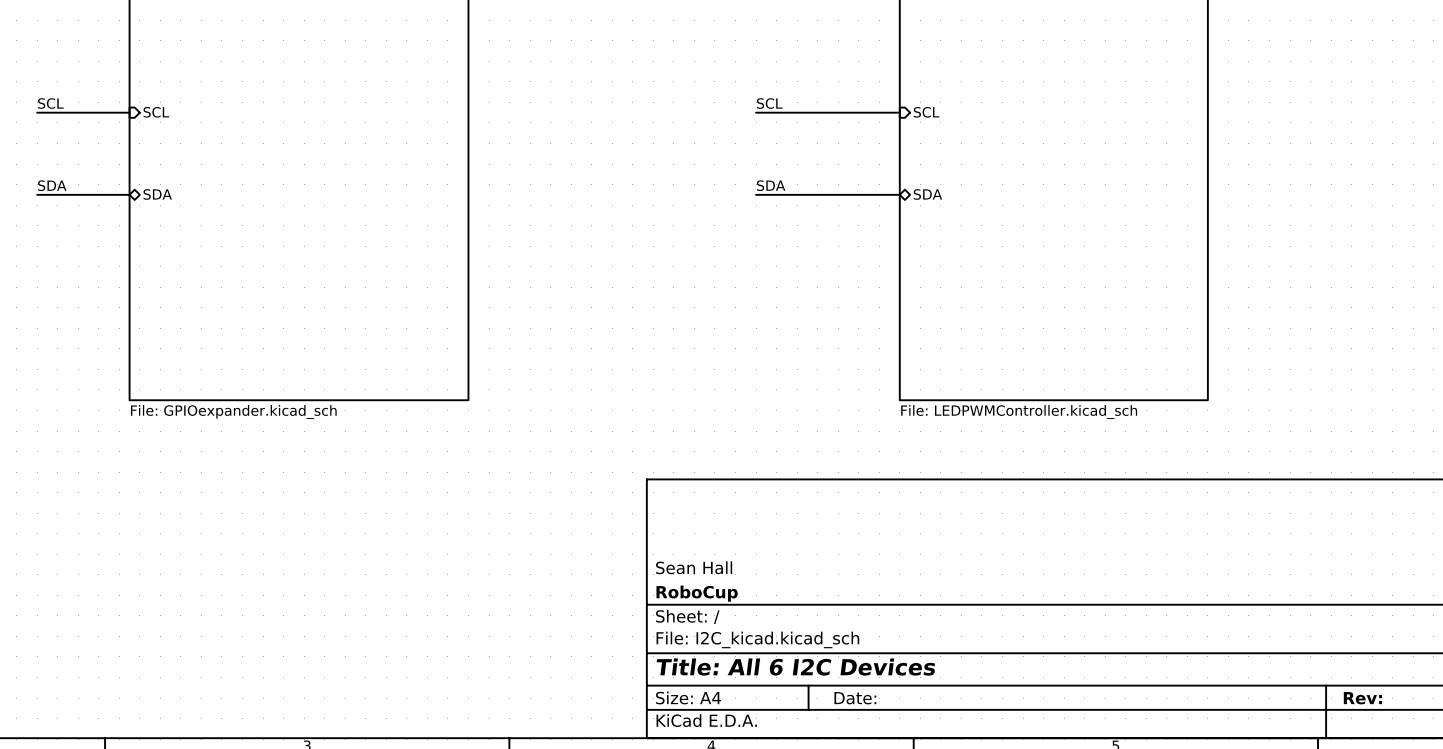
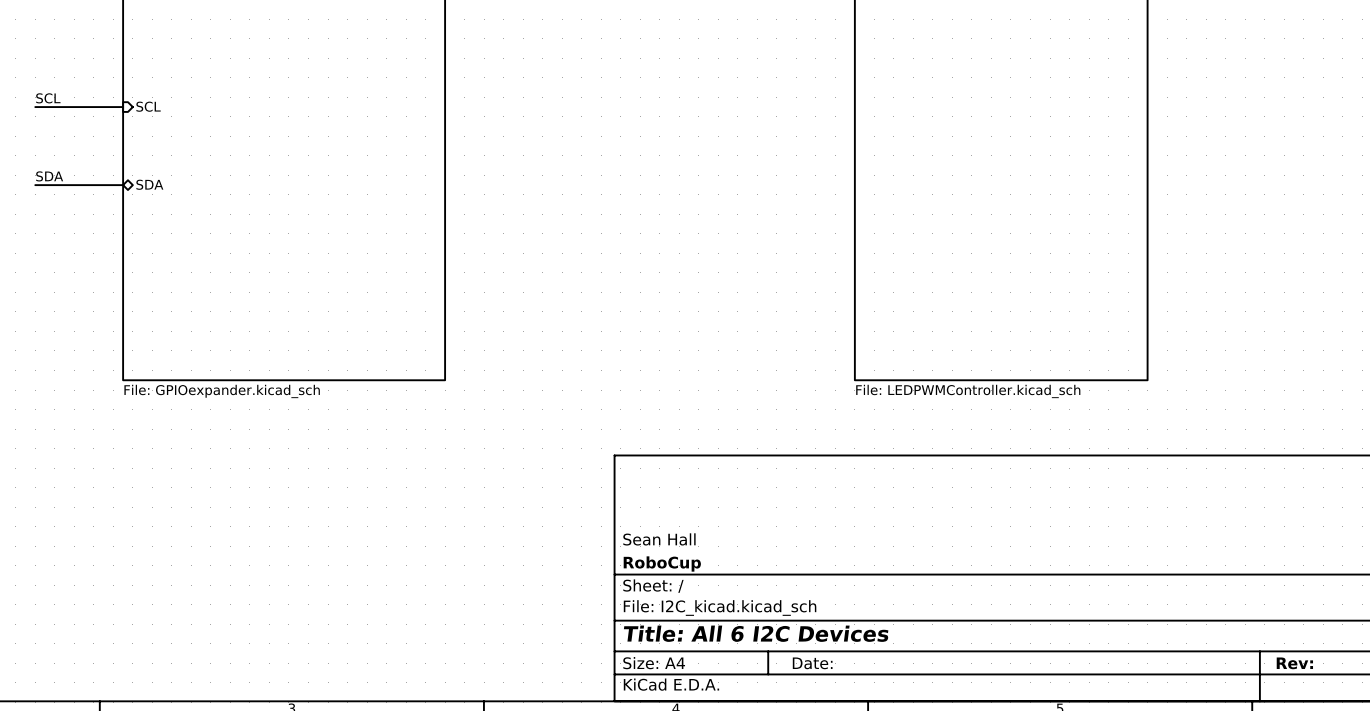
label: SCL (769, 103) -> none
wire: (756, 112) (899, 112) -> none
sheet pin: SCL (926, 112) -> none
label: SDA (771, 185) -> none
wire: (756, 194) (899, 194) -> none
sheet pin: SDA (927, 194) -> none

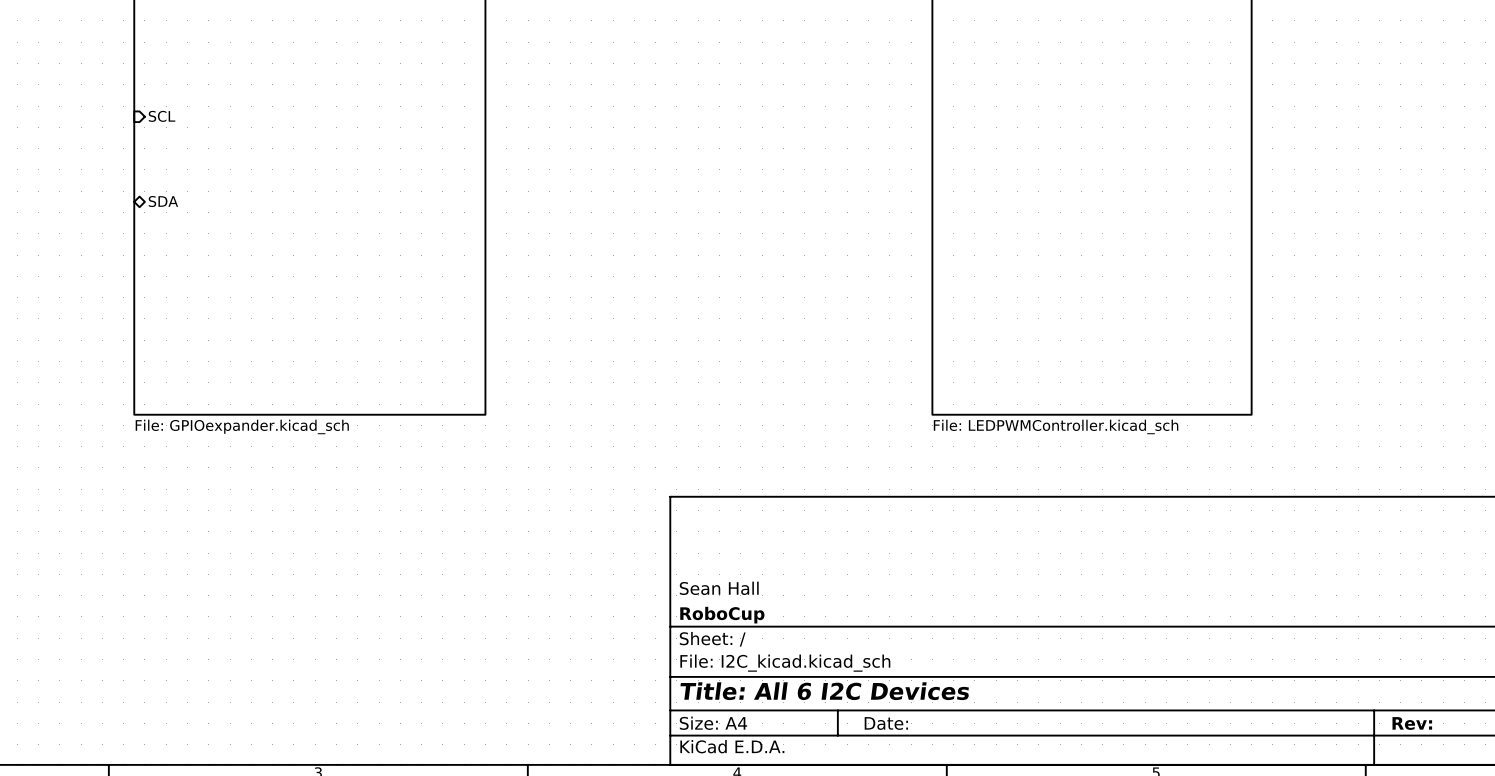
label: SCL (48, 98) -> none
wire: (35, 107) (123, 107) -> none
label: SDA (49, 176) -> none
wire: (35, 185) (123, 185) -> none

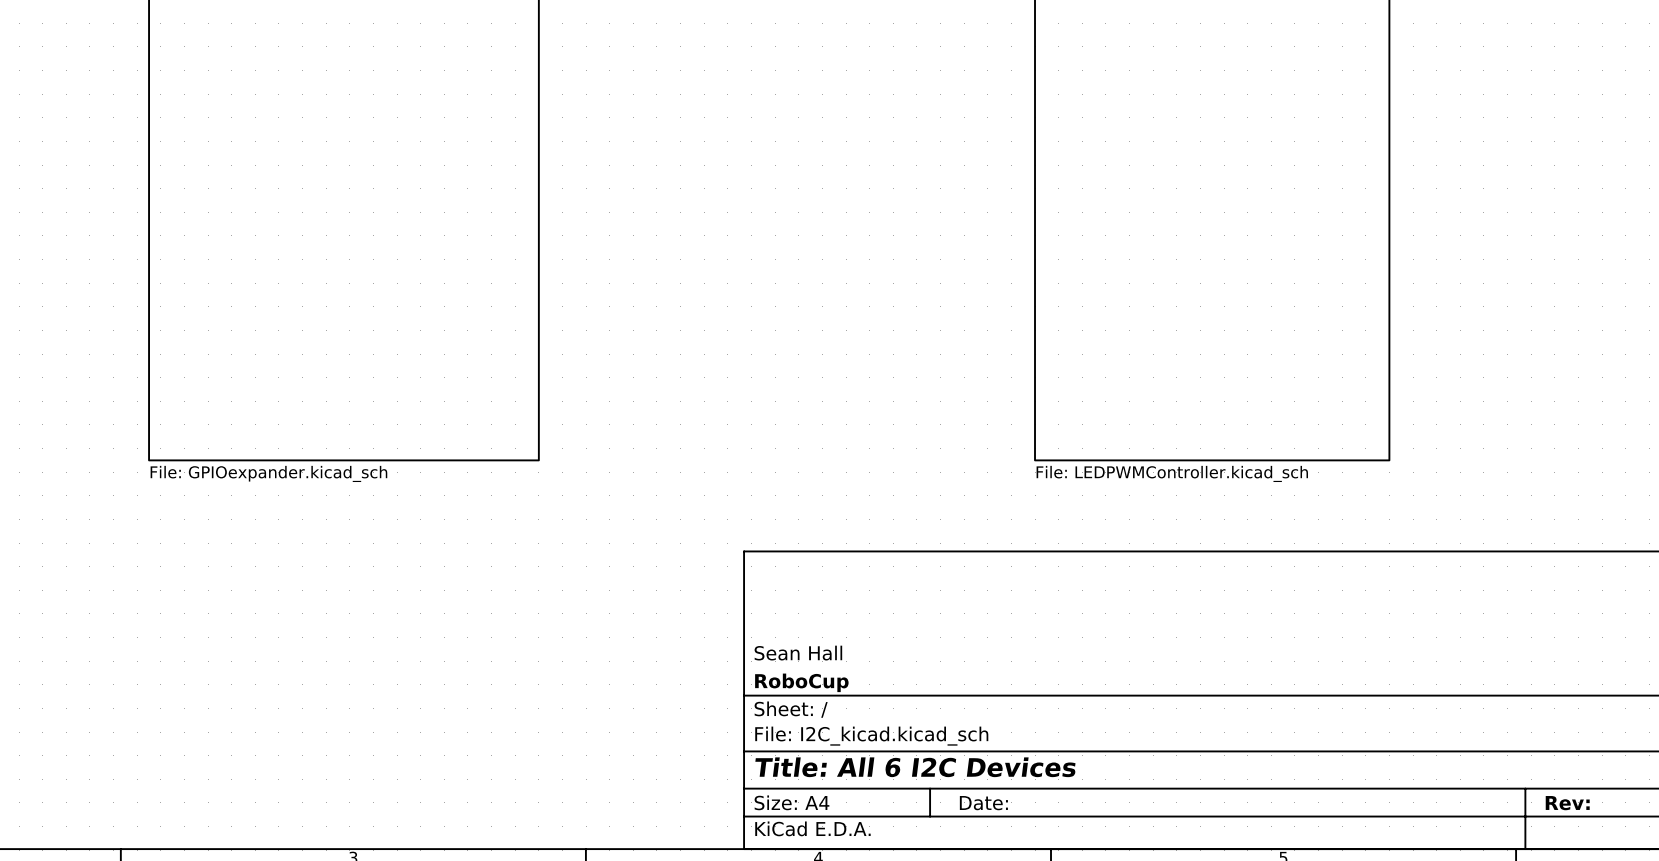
sheet pin: SCL (162, 116) -> none
sheet pin: SDA (163, 201) -> none

